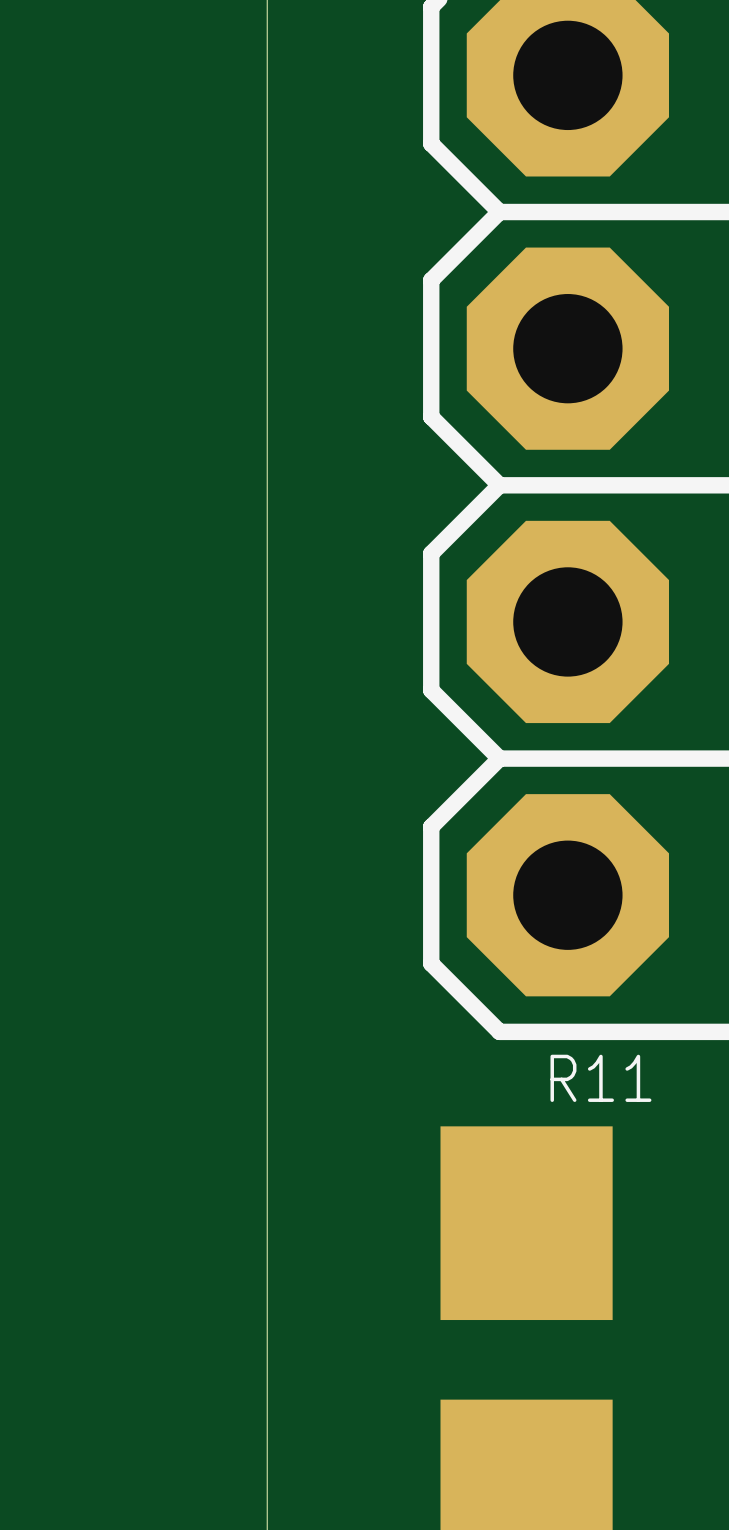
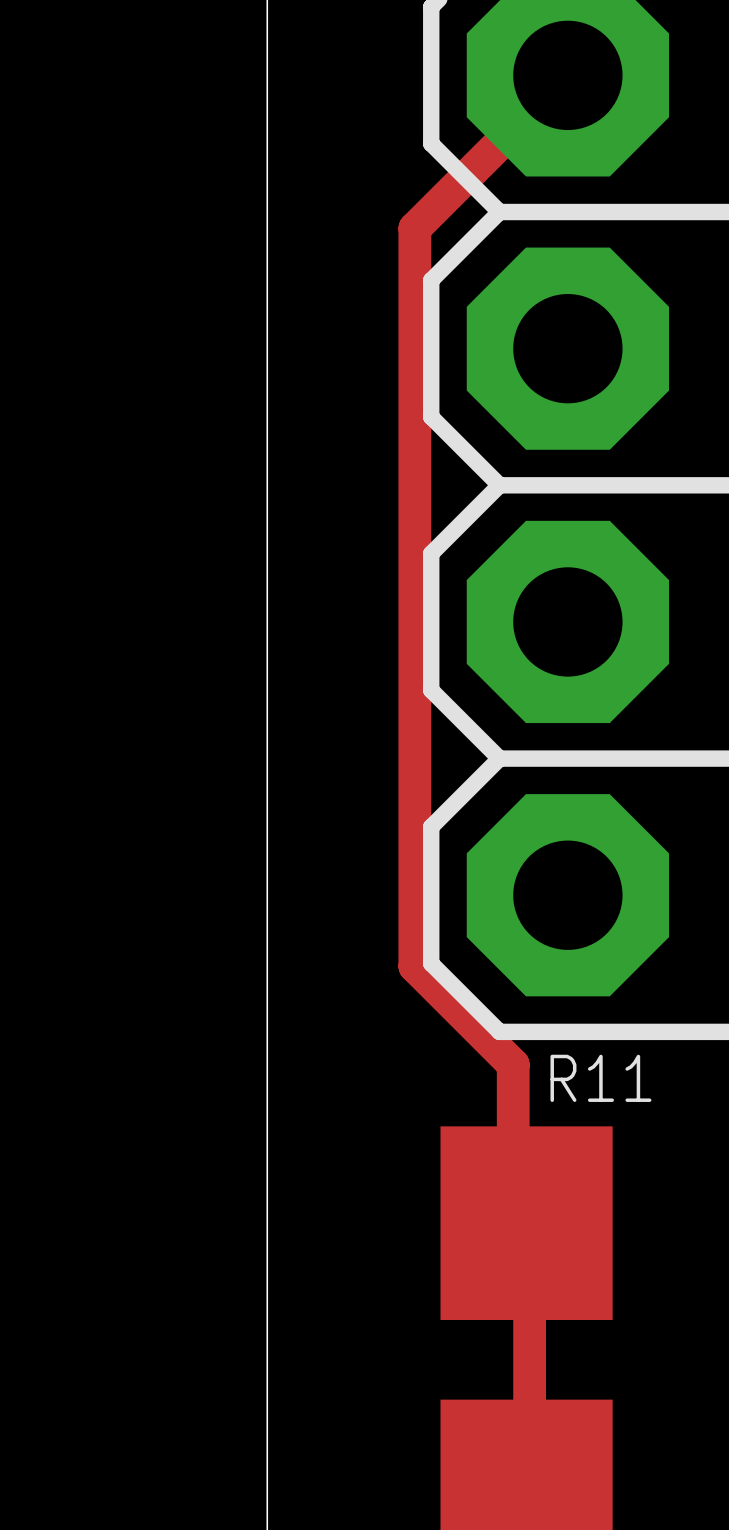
track: none -> (567, 75) (414, 228) (414, 966) (513, 1064) (513, 1212) (526, 1223) (529, 1228) (529, 1491) (526, 1496)

